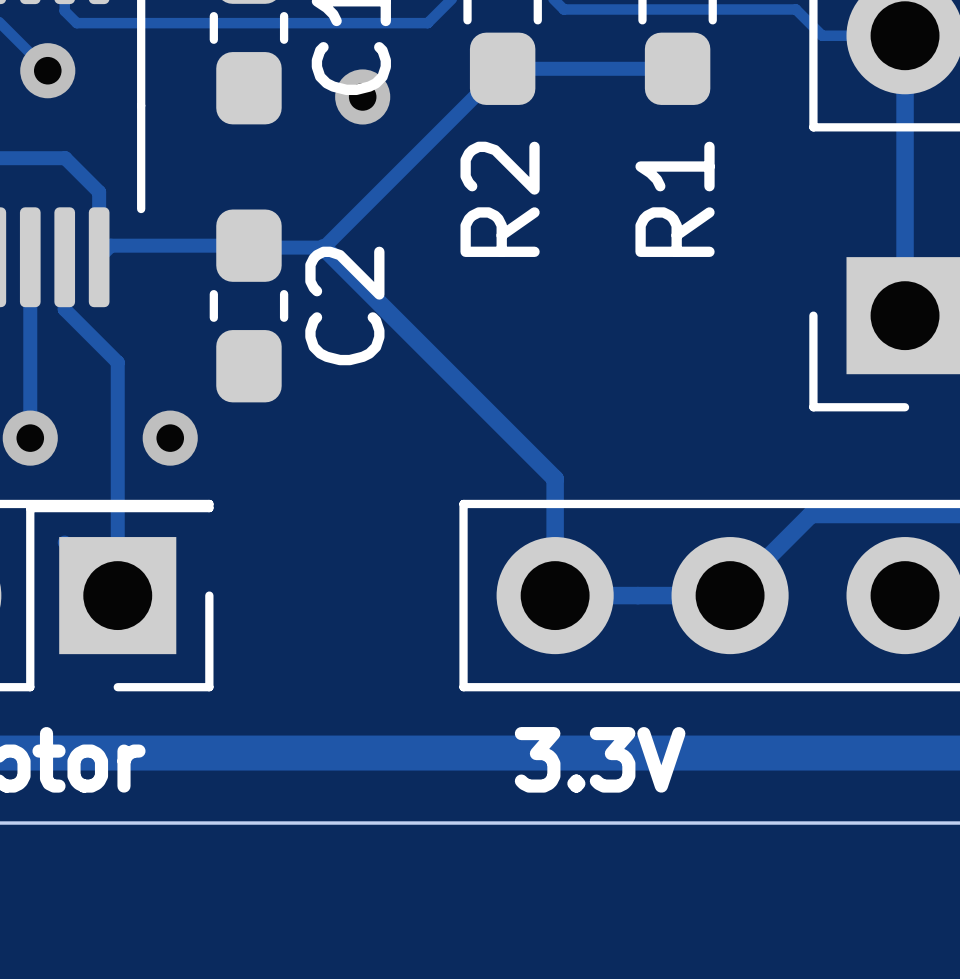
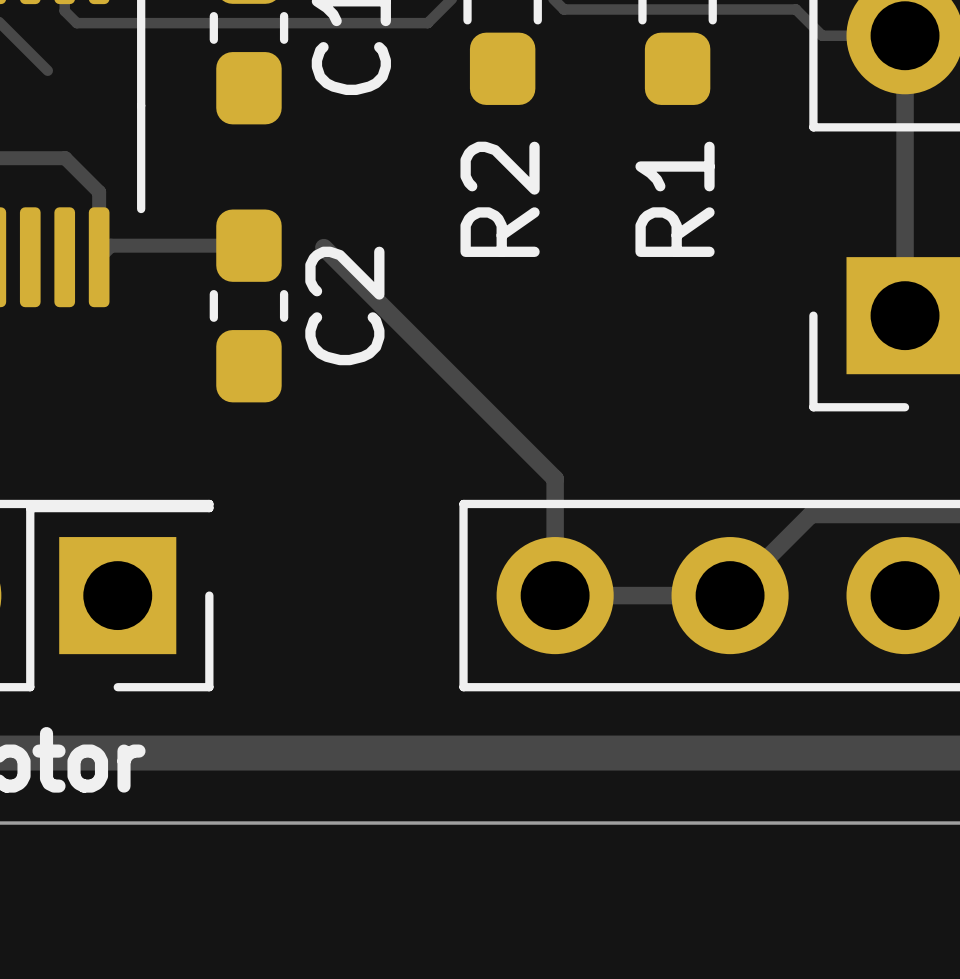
track: (677, 68) (502, 68) (323, 247) (222, 247) -> none
via: (47, 70) -> none
via: (362, 96) -> none
track: (30, 257) (30, 438) -> none
track: (64, 257) (64, 309) (117, 362) (117, 595) (64, 542) -> none
via: (30, 438) -> none
via: (170, 438) -> none
text: 3.3V (600, 759) -> none

